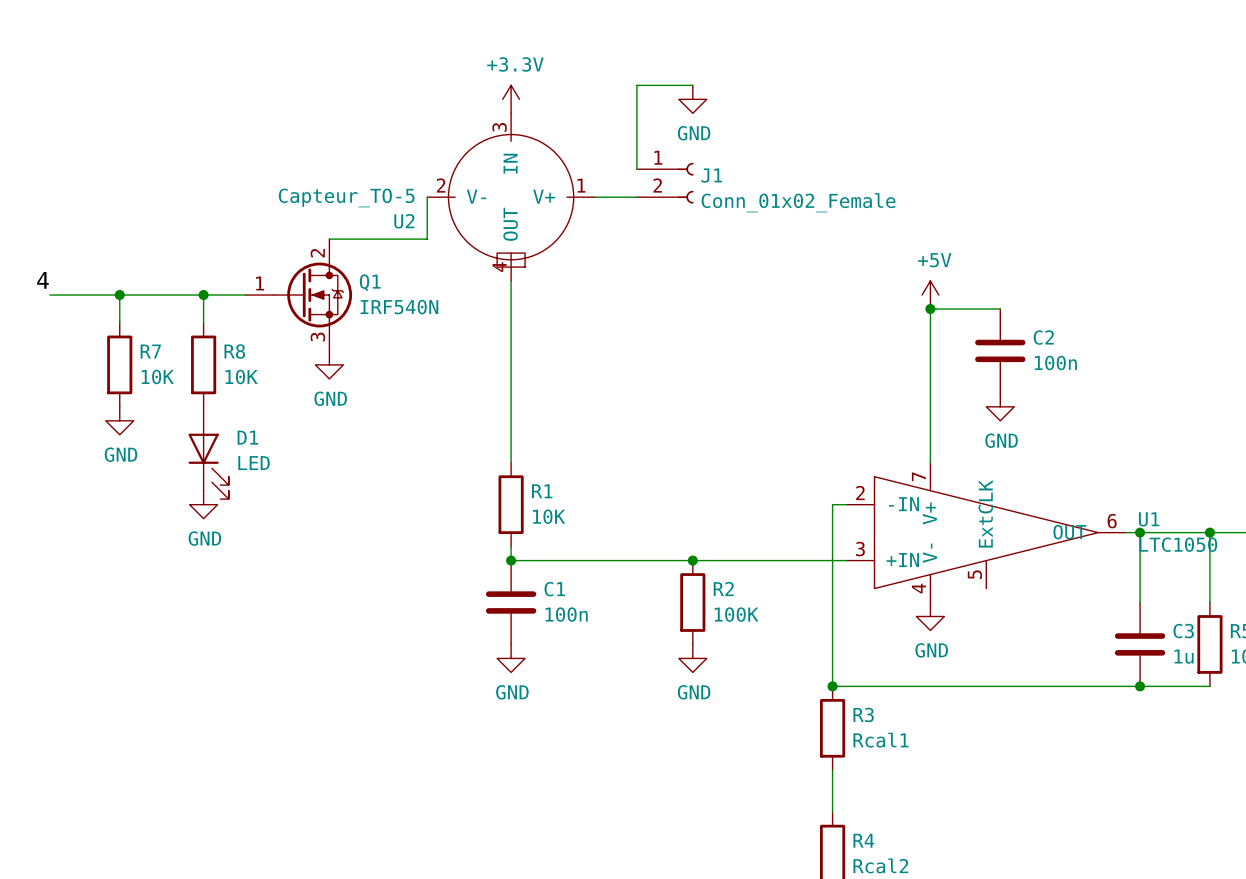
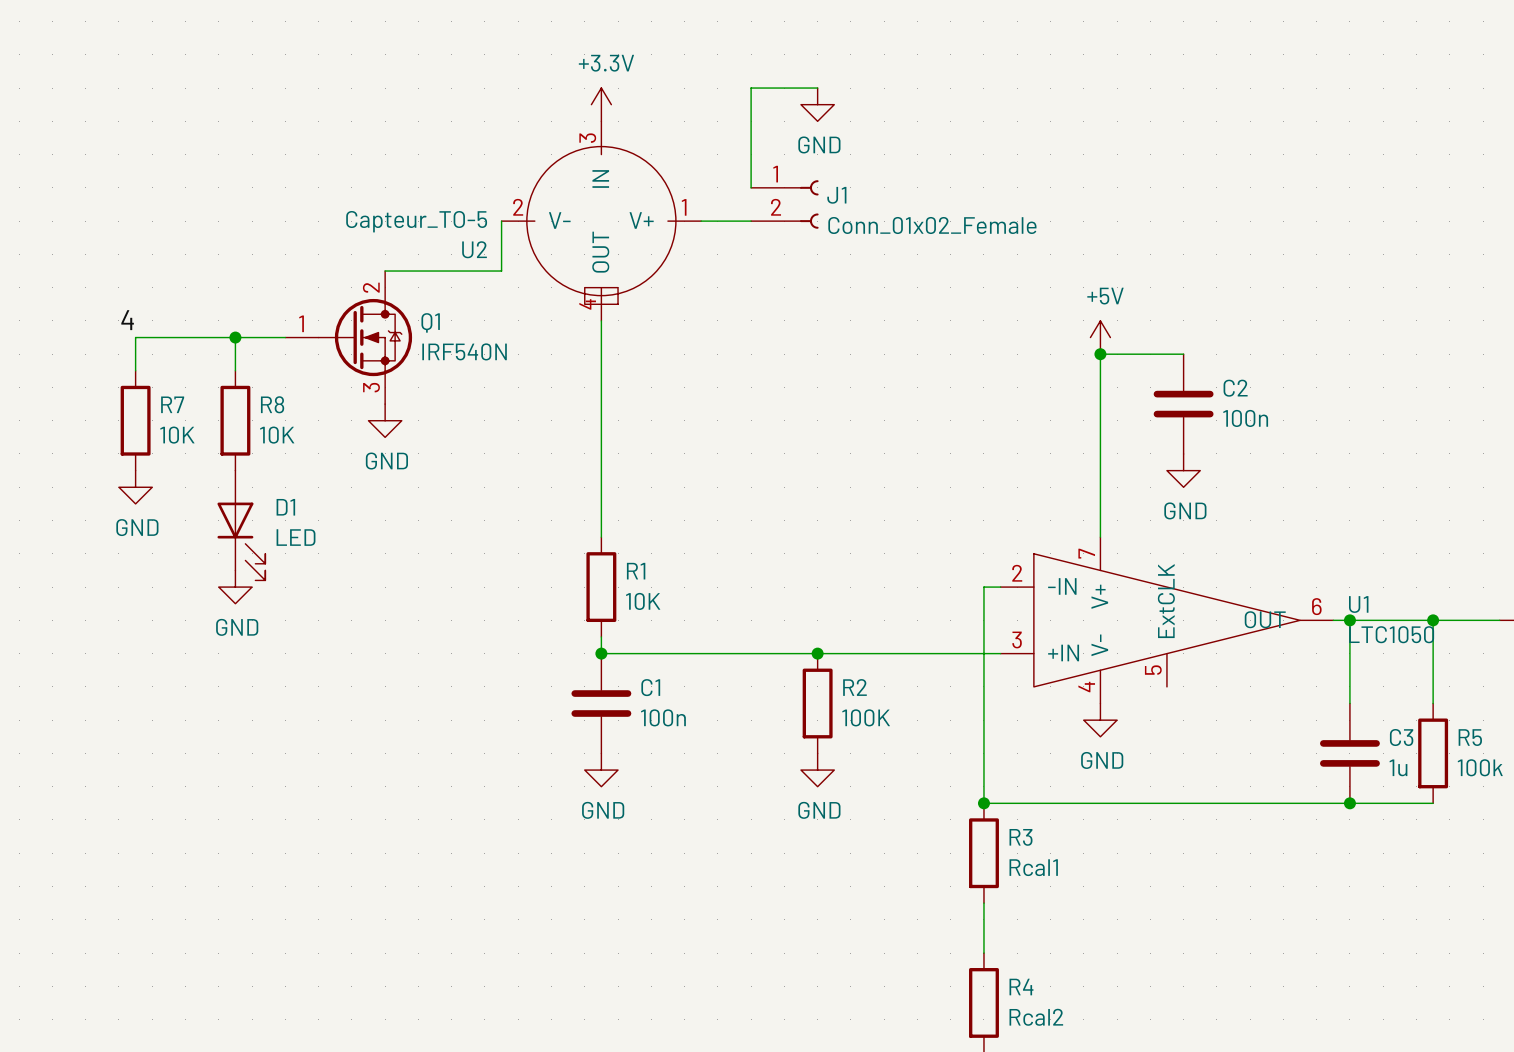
label position: 4 (42, 280) -> 4 (127, 320)
wire: (49, 295) (119, 295) -> none
junction: (119, 295) -> none

